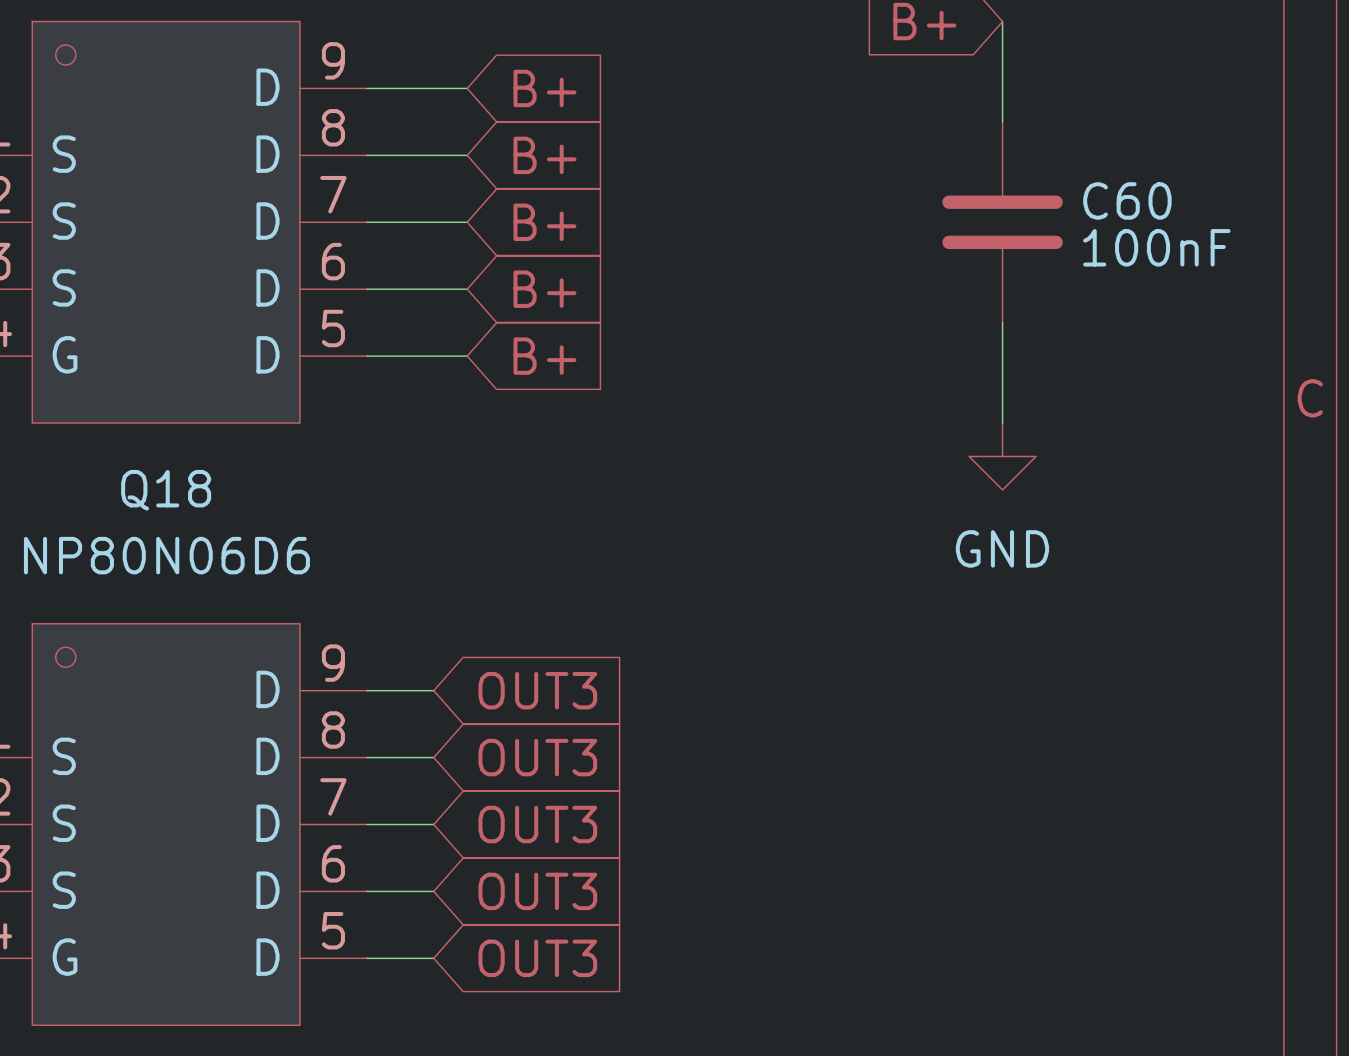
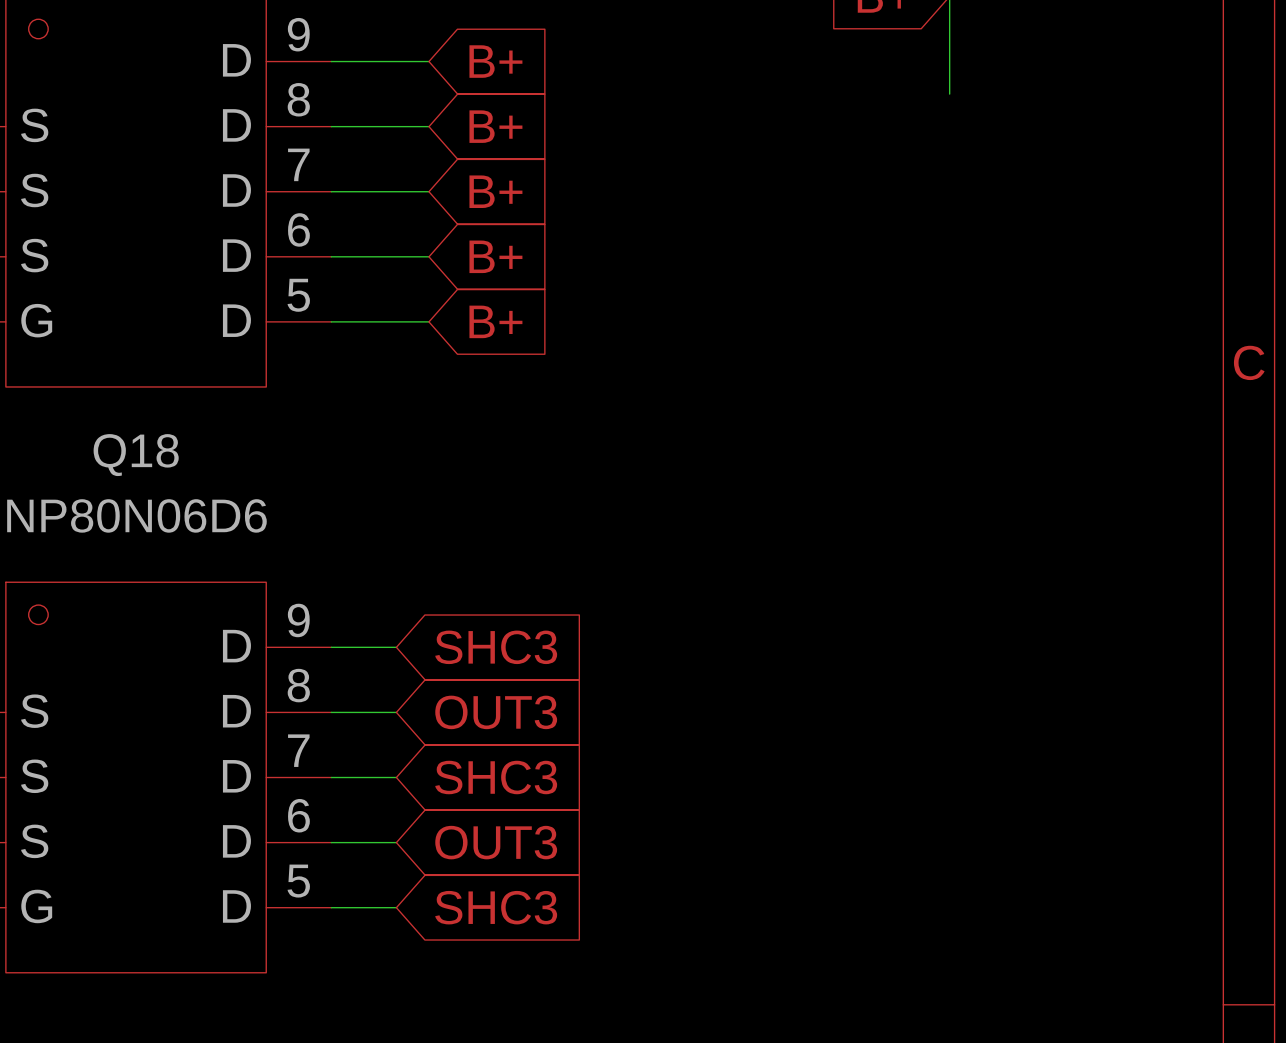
C60: 100nF (1002, 222) -> none
wire: (1002, 322) (1002, 423) -> none
power symbol: GND (1002, 456) -> none
global label: OUT3 (537, 690) -> SHC3 (496, 647)
global label: OUT3 (537, 824) -> SHC3 (496, 777)
global label: OUT3 (537, 958) -> SHC3 (496, 907)

